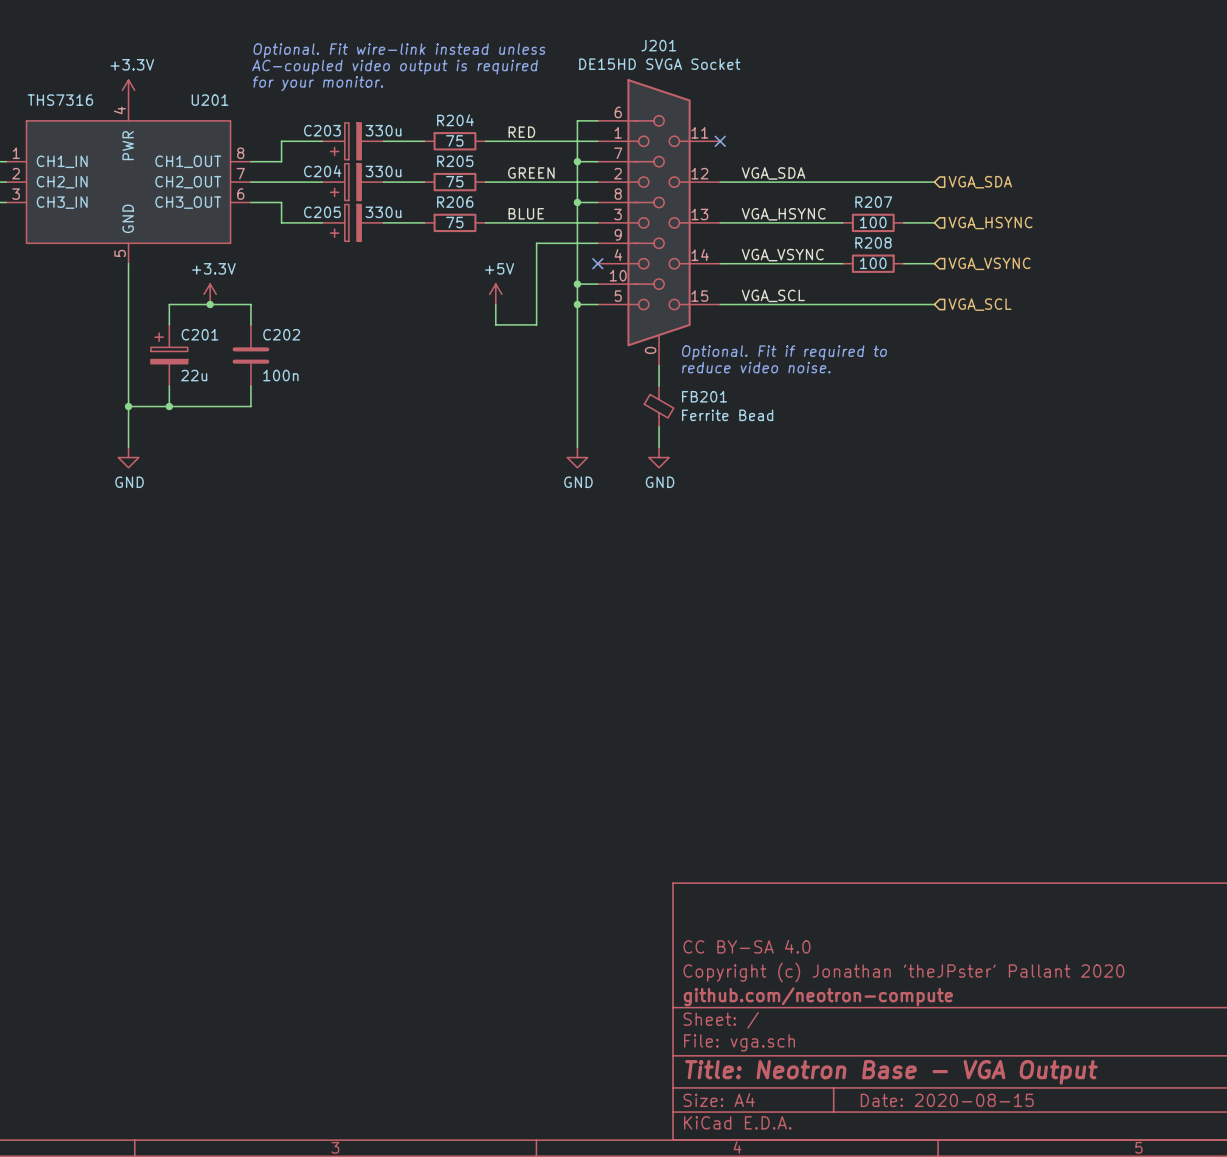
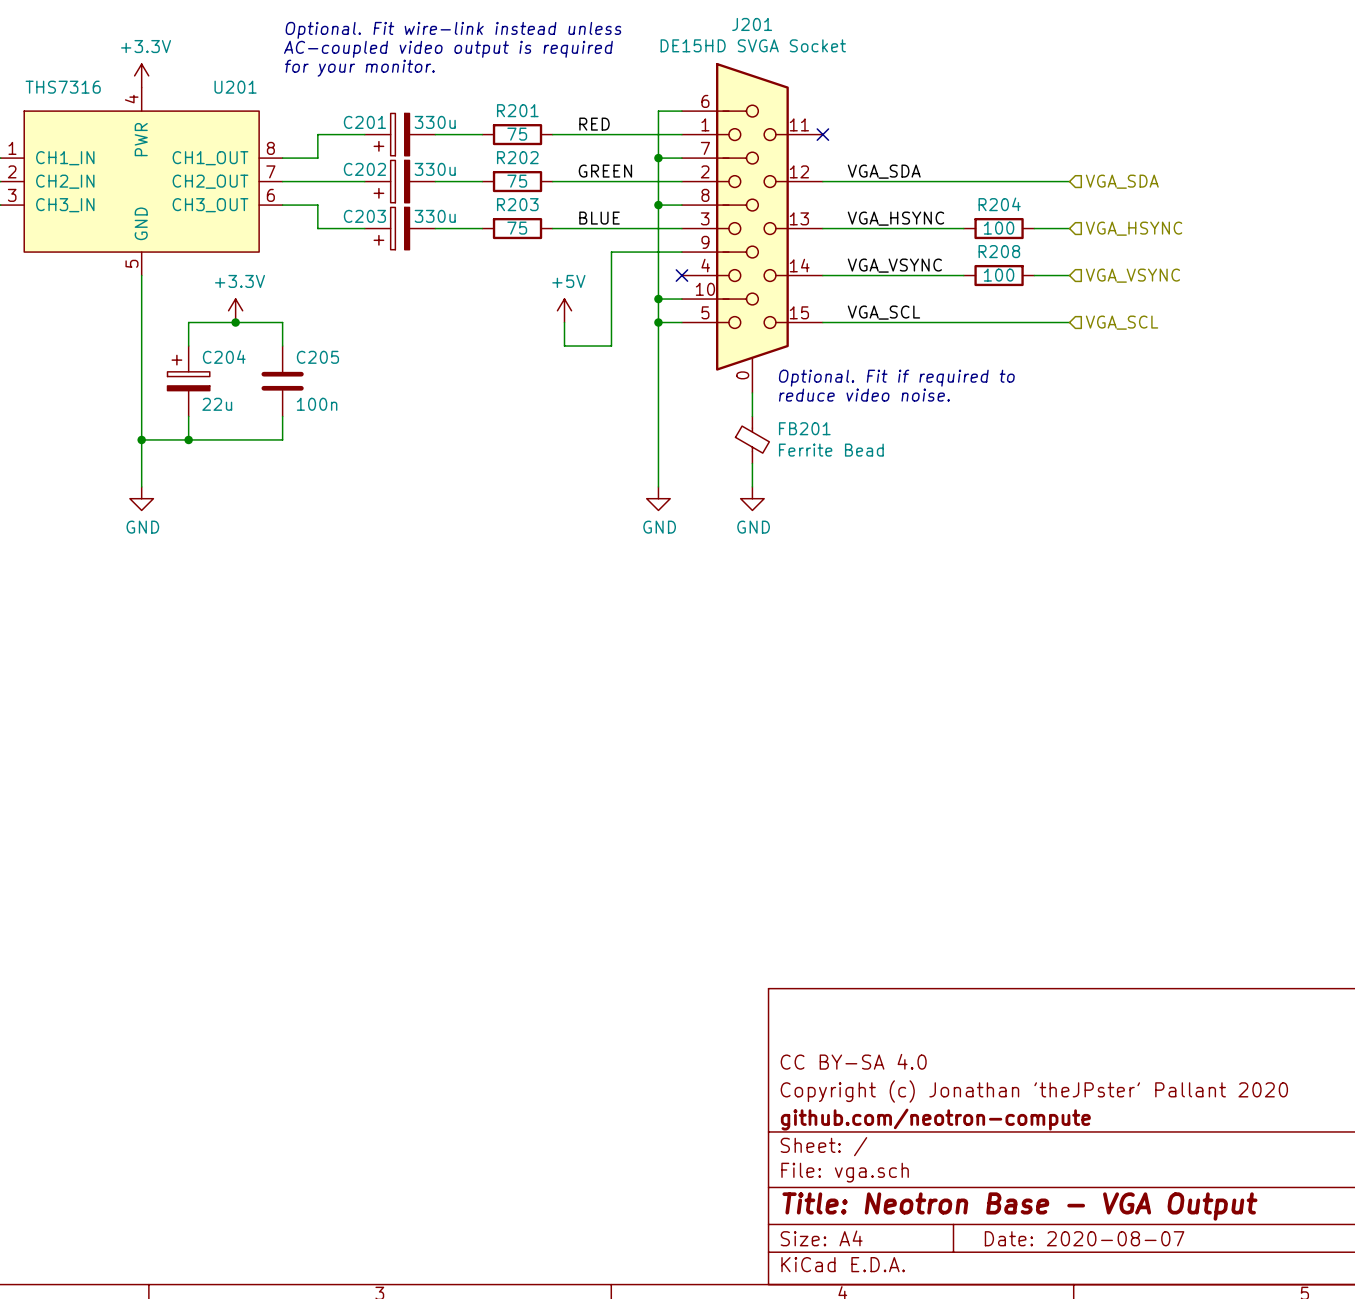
R204 name: R204 (455, 120) -> R201 (517, 110)
C203 name: C203 (322, 130) -> C201 (364, 122)
R205 name: R205 (455, 161) -> R202 (517, 157)
C204 name: C204 (322, 171) -> C202 (364, 169)
R206 name: R206 (455, 202) -> R203 (517, 204)
R207 name: R207 (873, 202) -> R204 (999, 204)
C205 name: C205 (322, 212) -> C203 (364, 216)
C201 name: C201 (200, 334) -> C204 (224, 357)
C202 name: C202 (281, 334) -> C205 (317, 357)
title block: Date: 2020-08-15 (947, 1100) -> Date: 2020-08-07 (1084, 1238)

